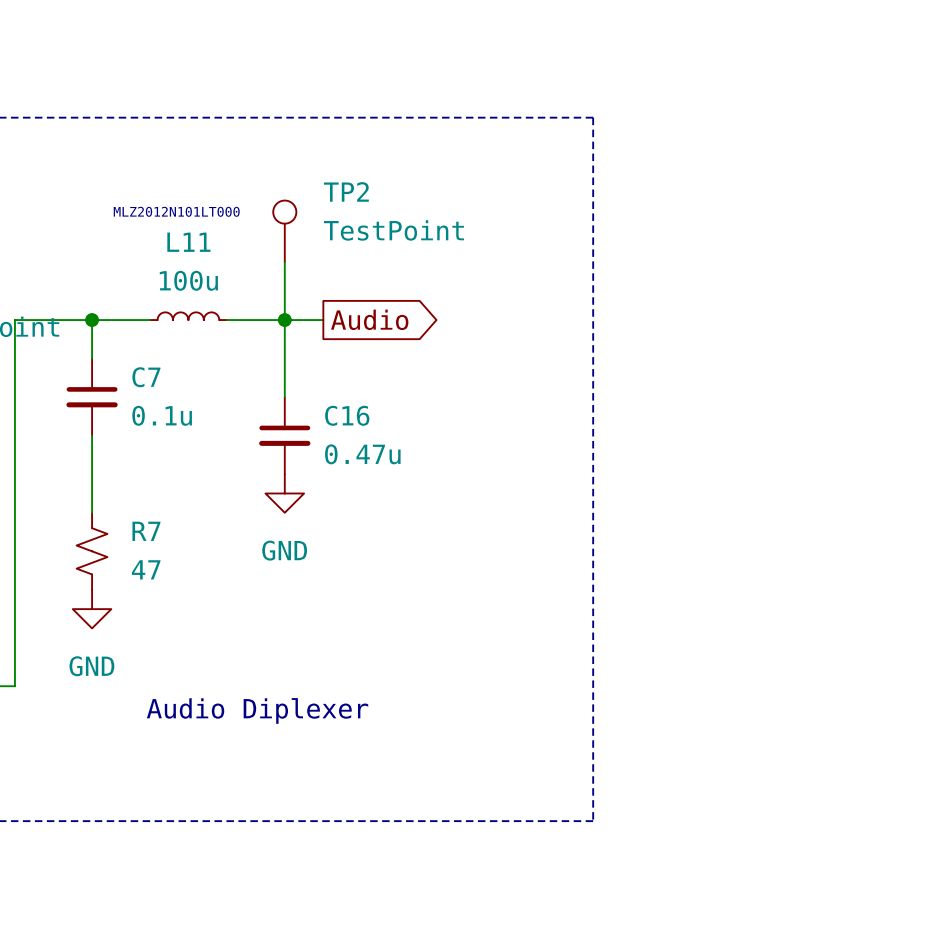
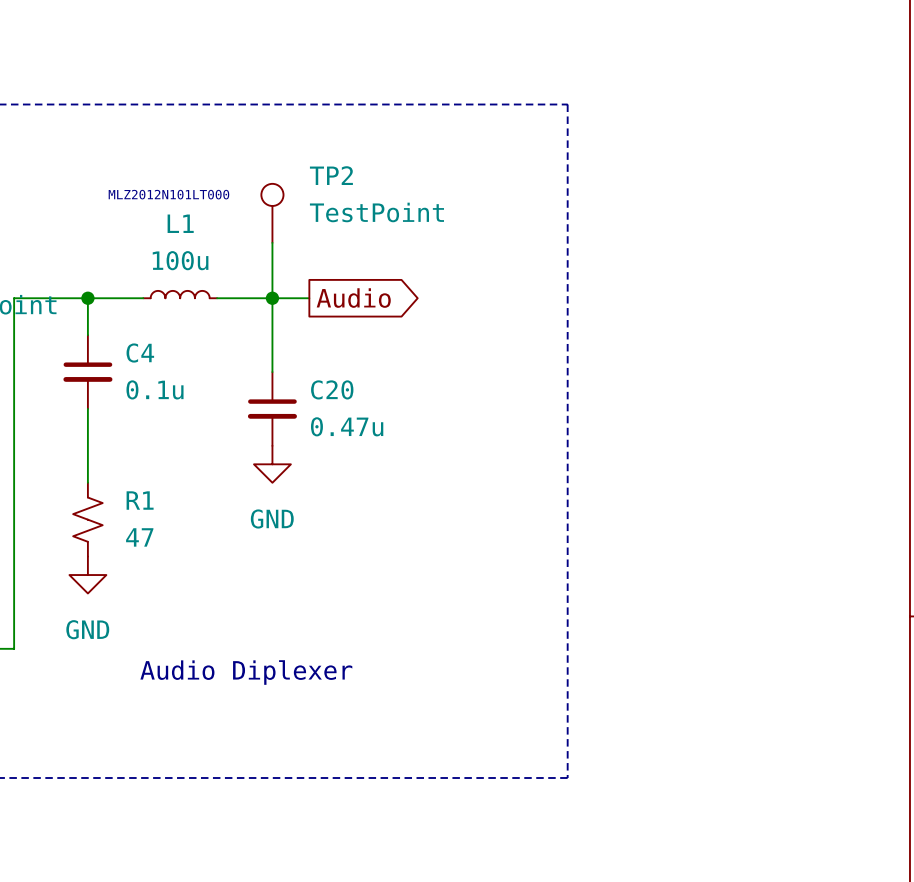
L11 name: L11 (188, 242) -> L1 (180, 223)
C7 name: C7 (146, 377) -> C4 (140, 353)
C16 name: C16 (347, 415) -> C20 (332, 389)
R7 name: R7 (146, 531) -> R1 (140, 500)

